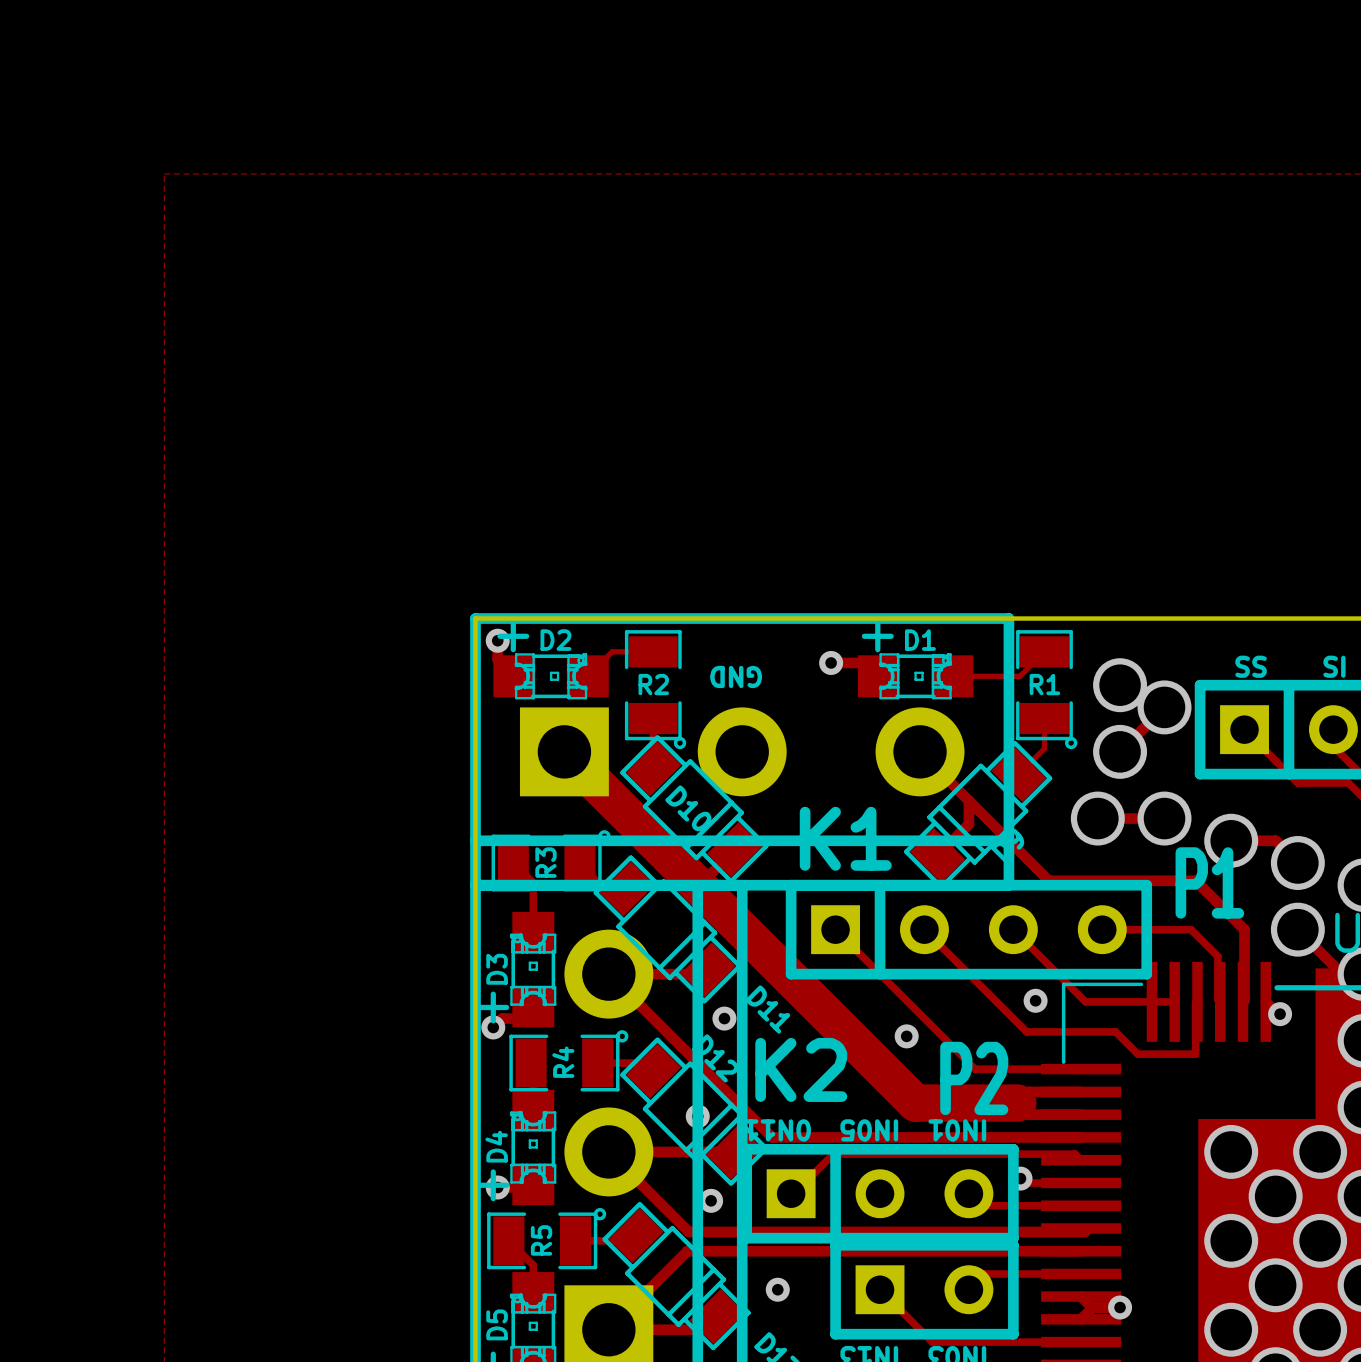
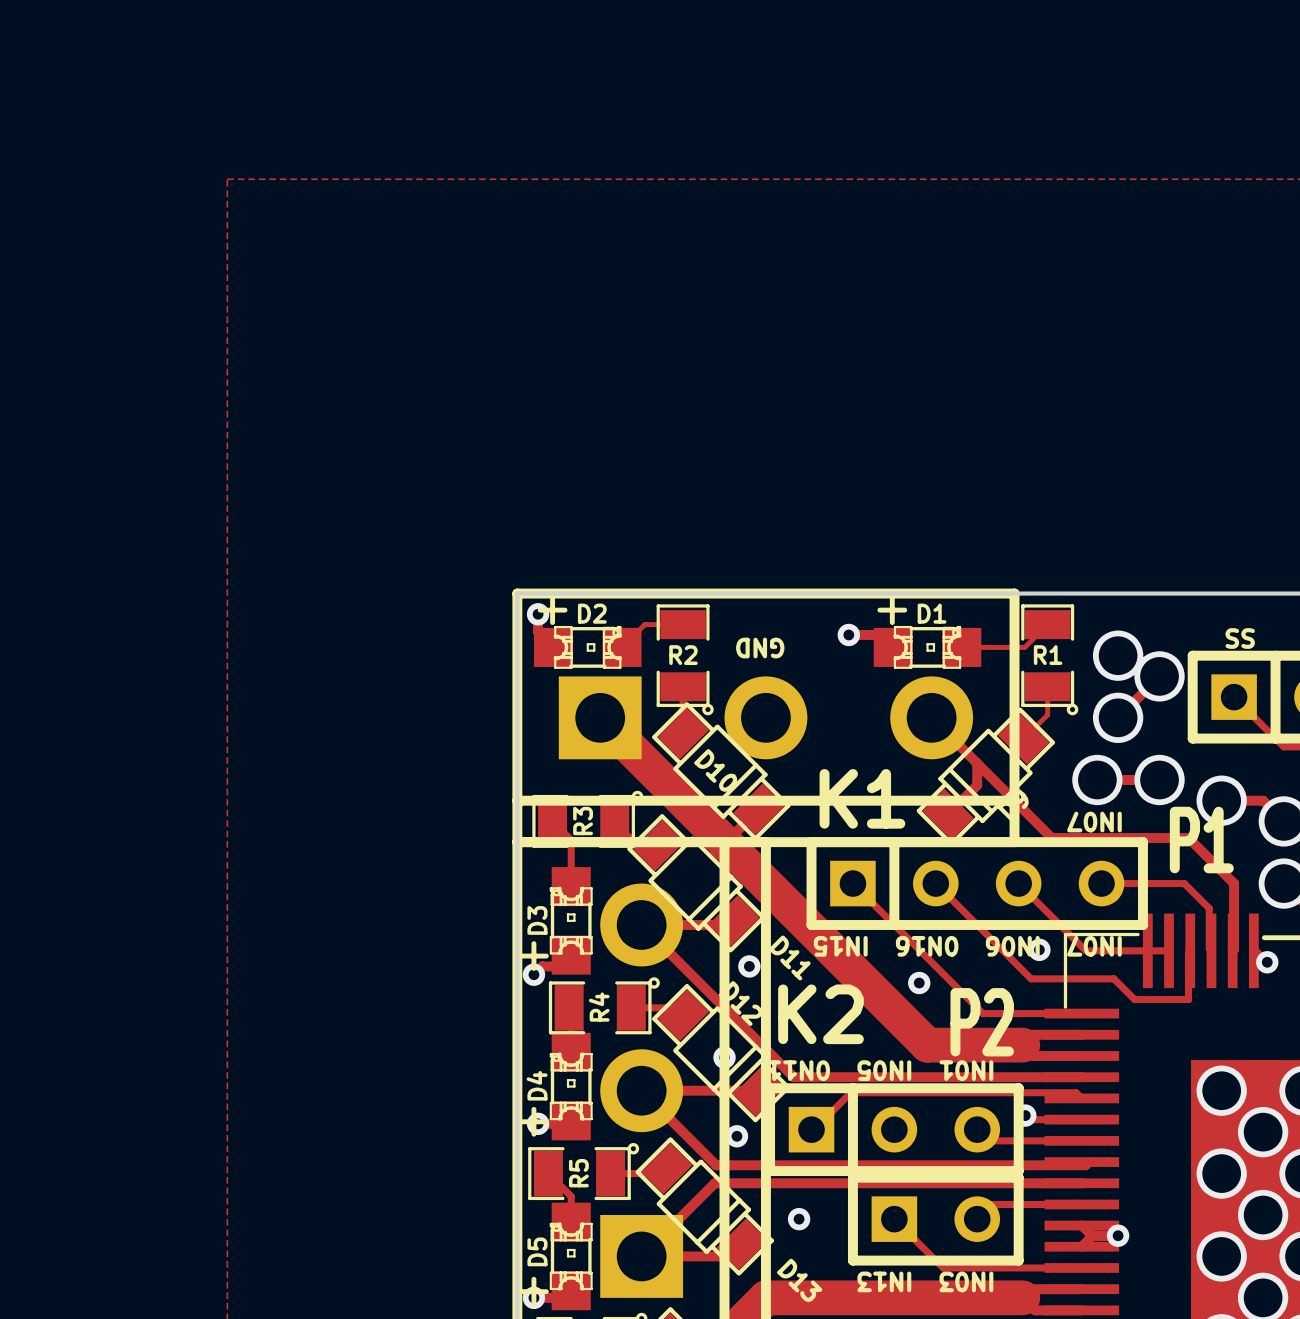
text: none -> IN07 (1094, 822)
text: none -> IN07 IN06 0N16 IN15 (967, 946)

